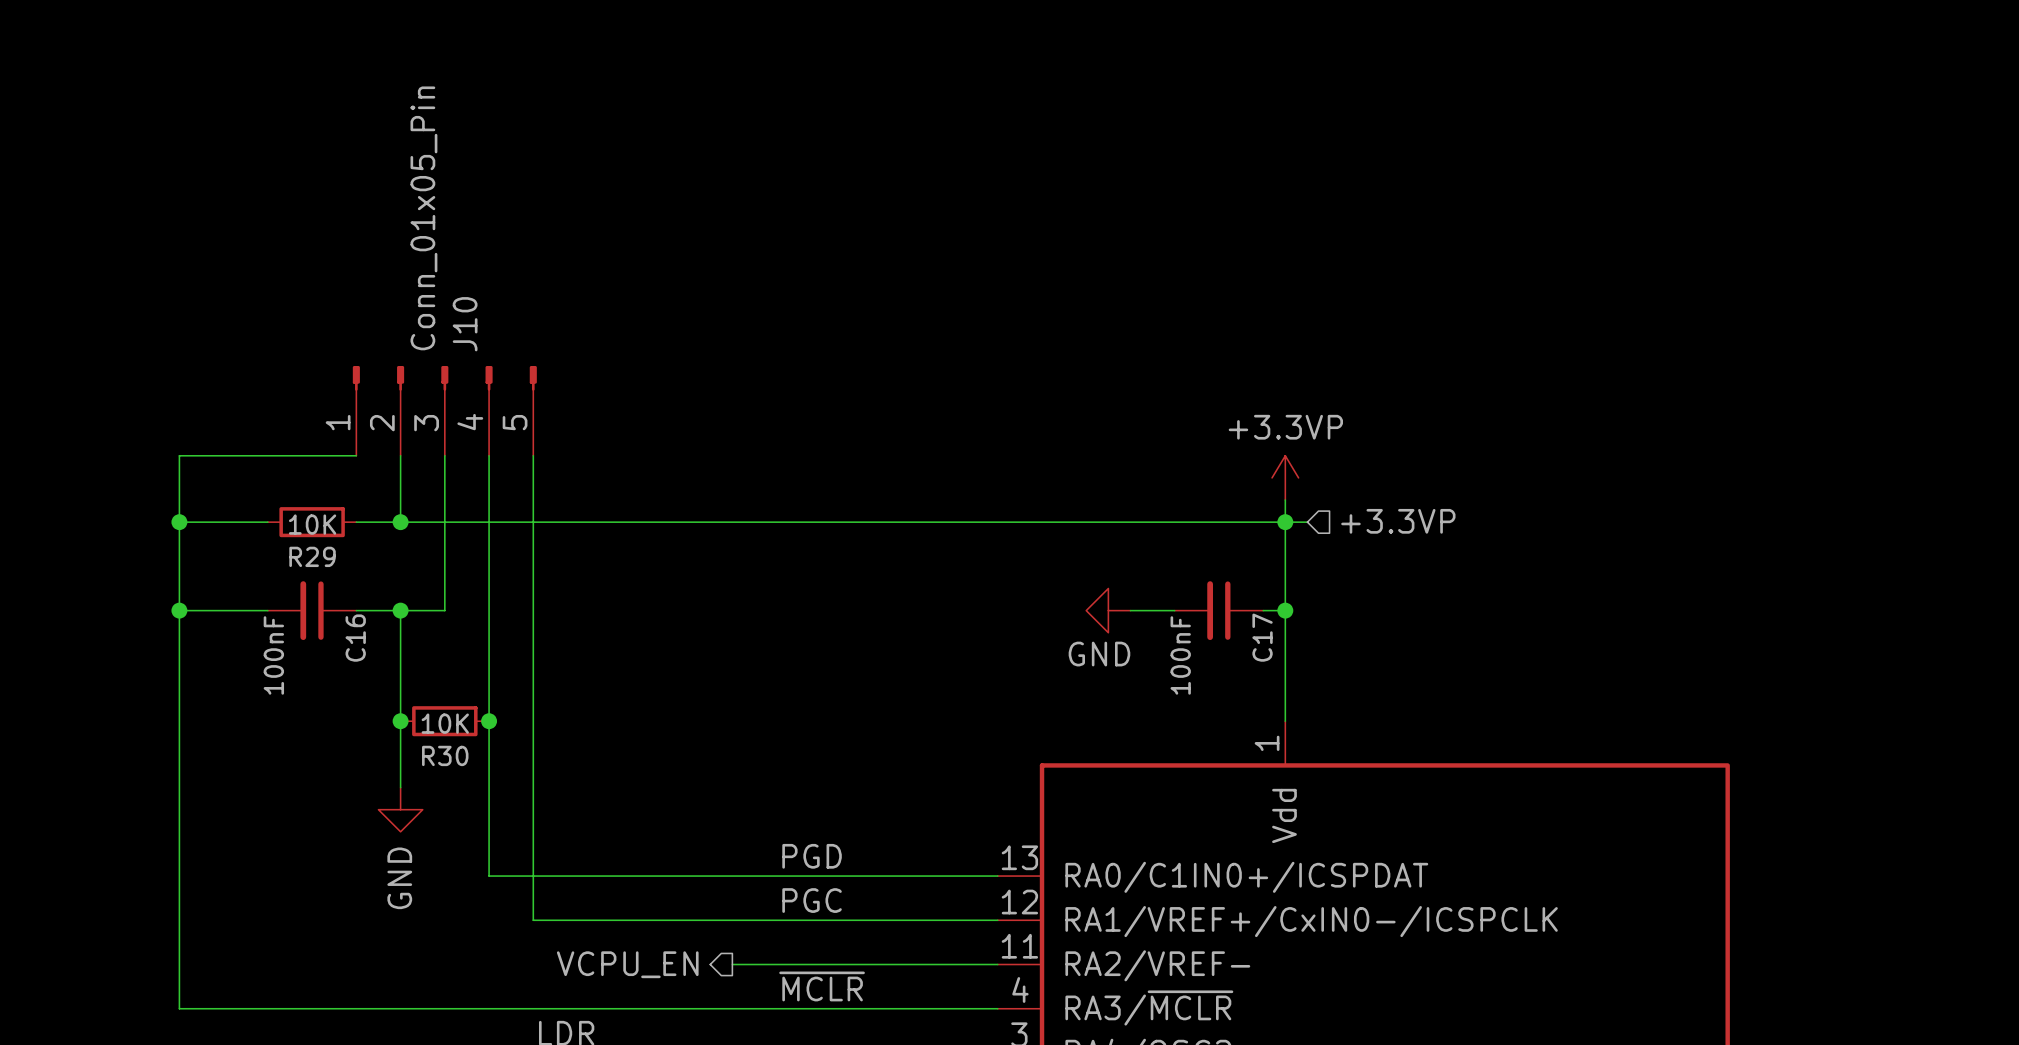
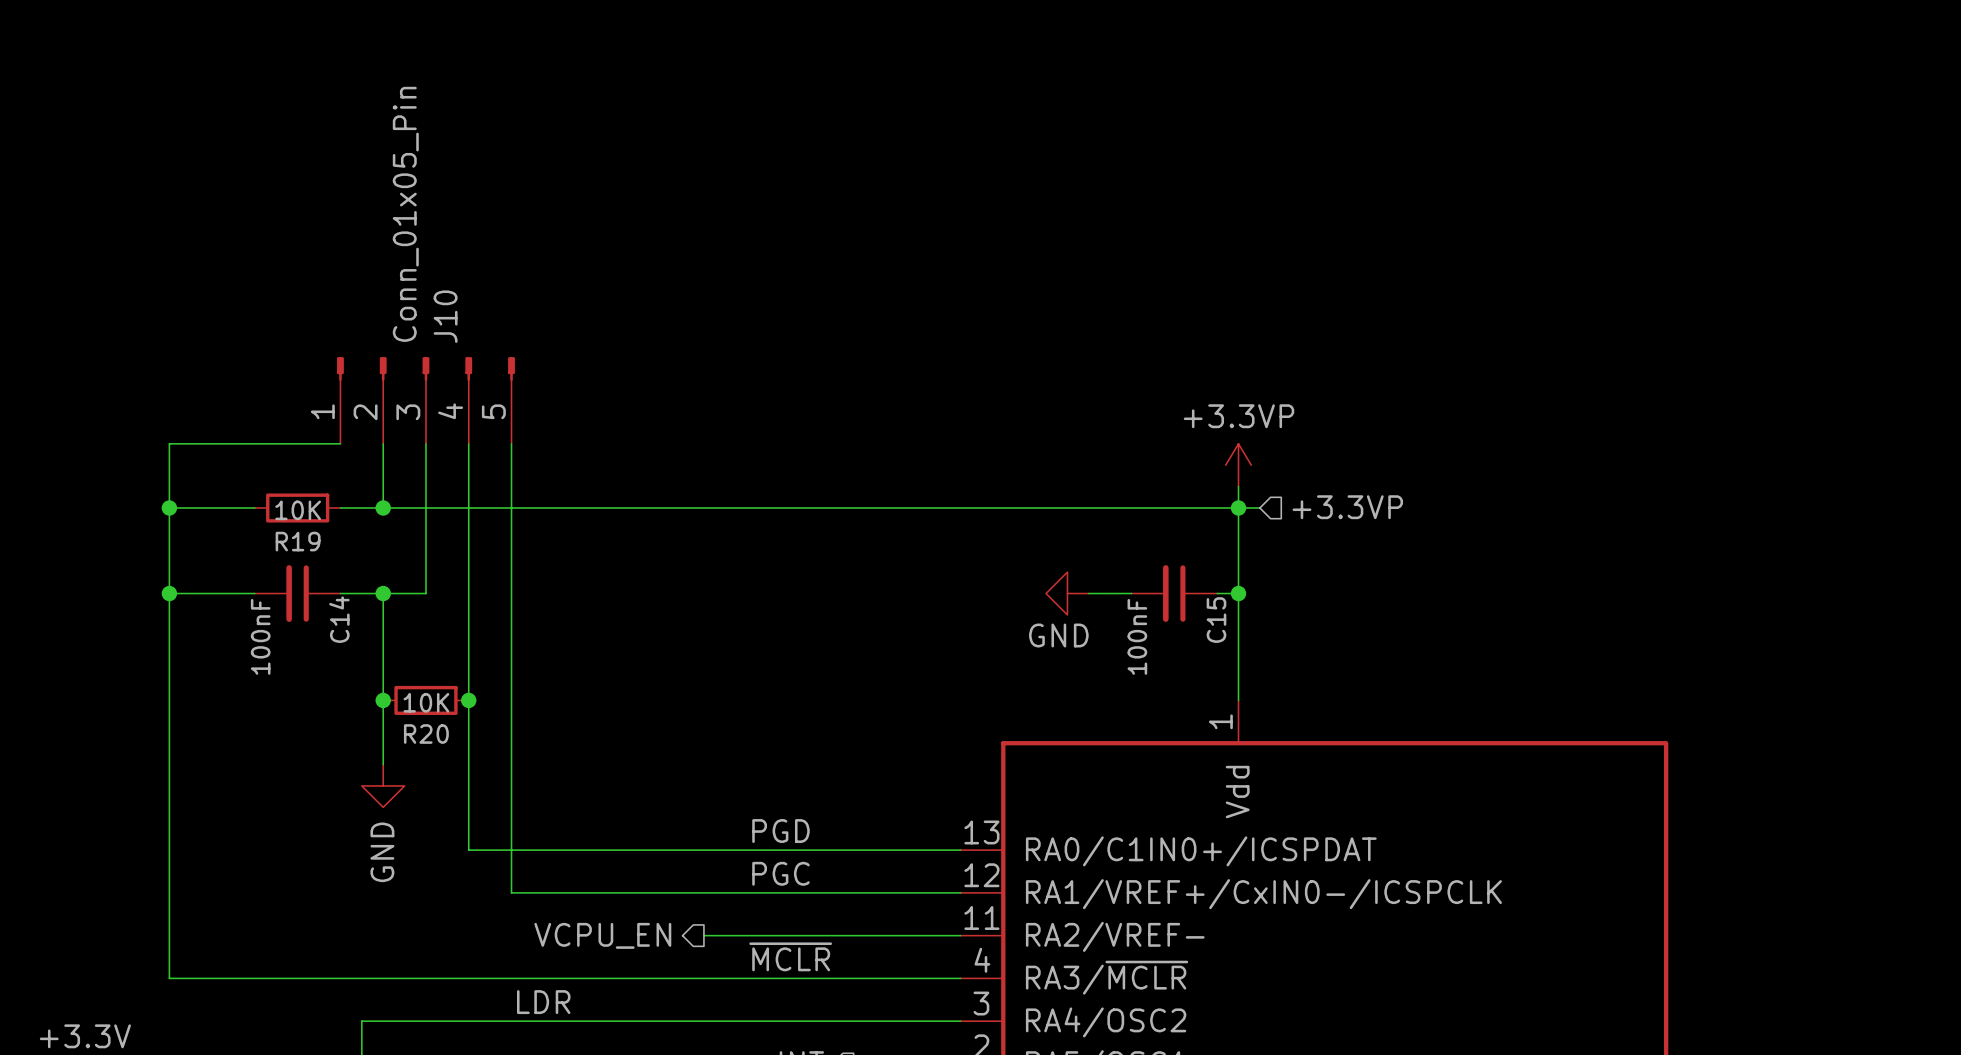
R29 name: R29 (312, 556) -> R19 (298, 541)
C17 name: C17 (1262, 637) -> C15 (1216, 620)
C16 name: C16 (355, 638) -> C14 (339, 619)
R30 name: R30 (445, 755) -> R20 (426, 734)

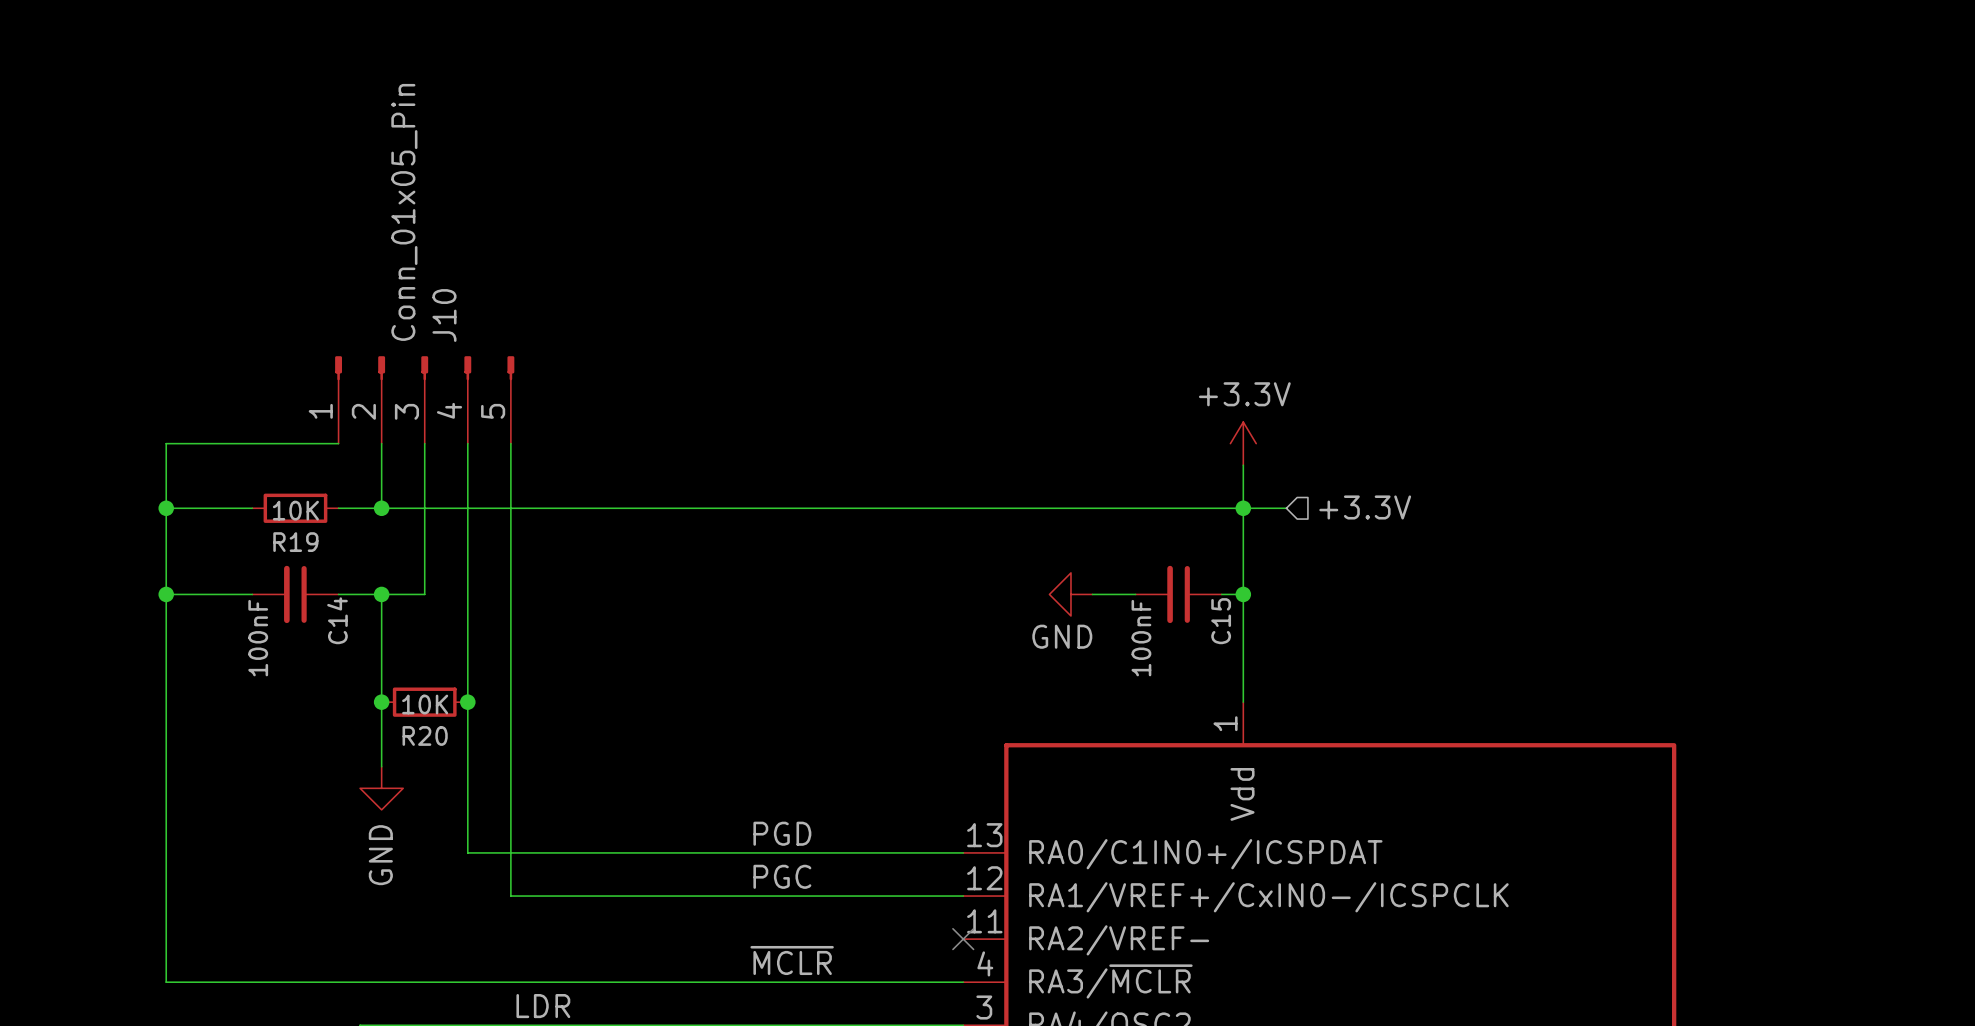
power symbol: none -> +3.3V (1243, 443)
power symbol: +3.3VP (1238, 465) -> none
hierarchical label: +3.3VP (1347, 507) -> +3.3V (1365, 507)
wire: none -> (1264, 508) (1286, 508)
hierarchical label: VCPU_EN (602, 935) -> none
wire: (703, 935) (960, 935) -> none
no-connect mark: none -> (963, 939)

